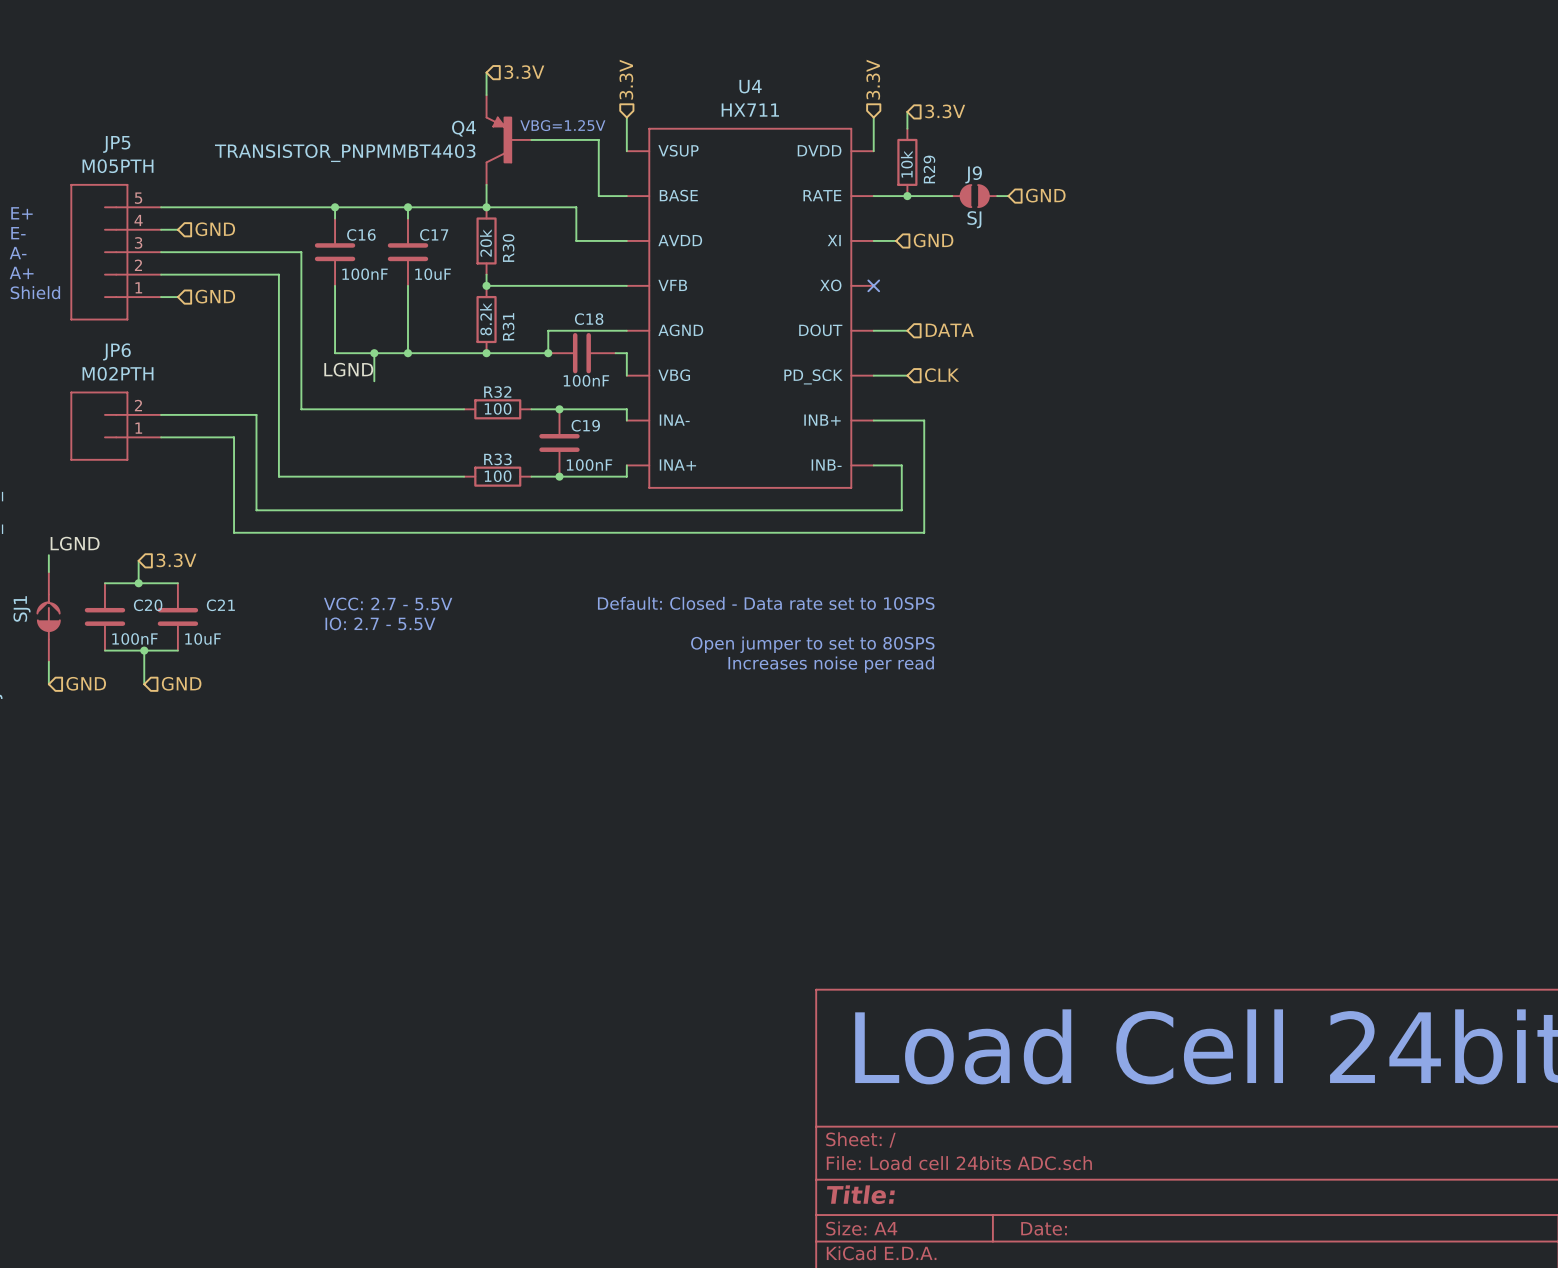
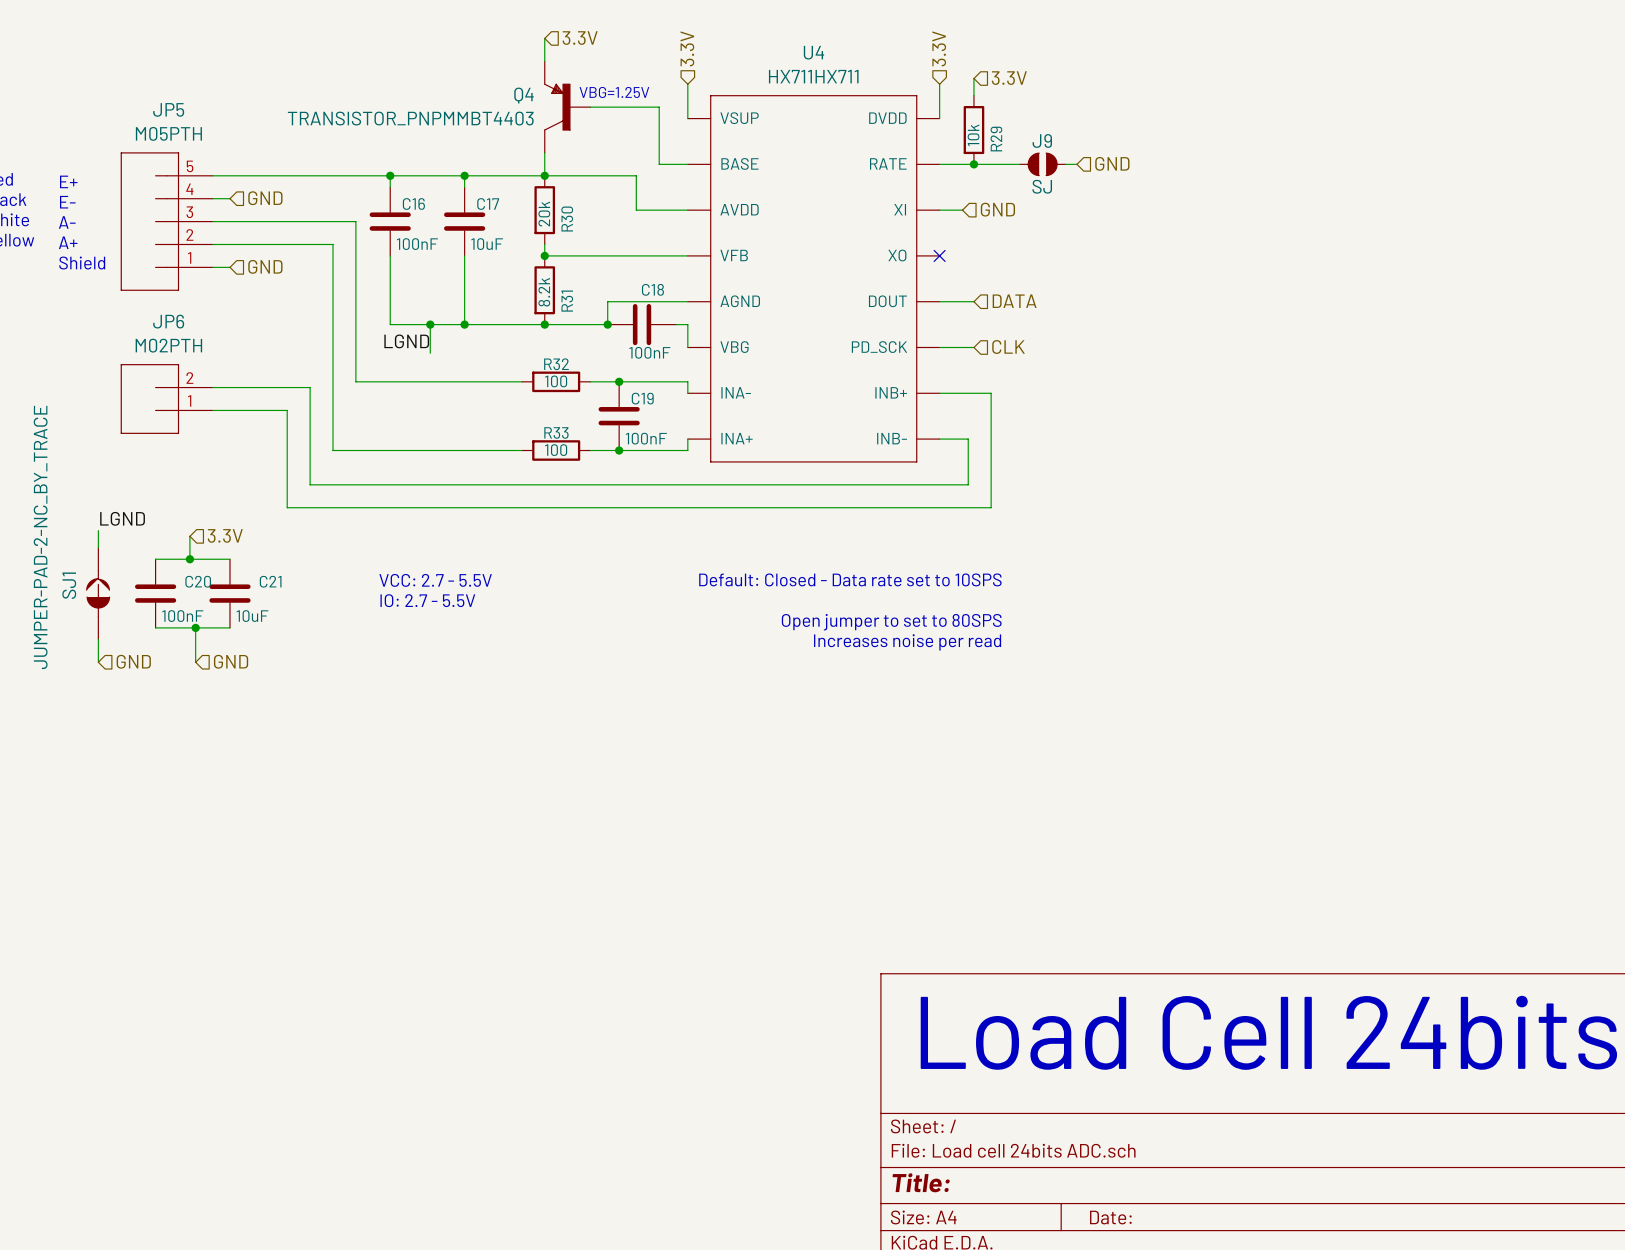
U4 value: HX711 (750, 110) -> HX711HX711 (813, 76)

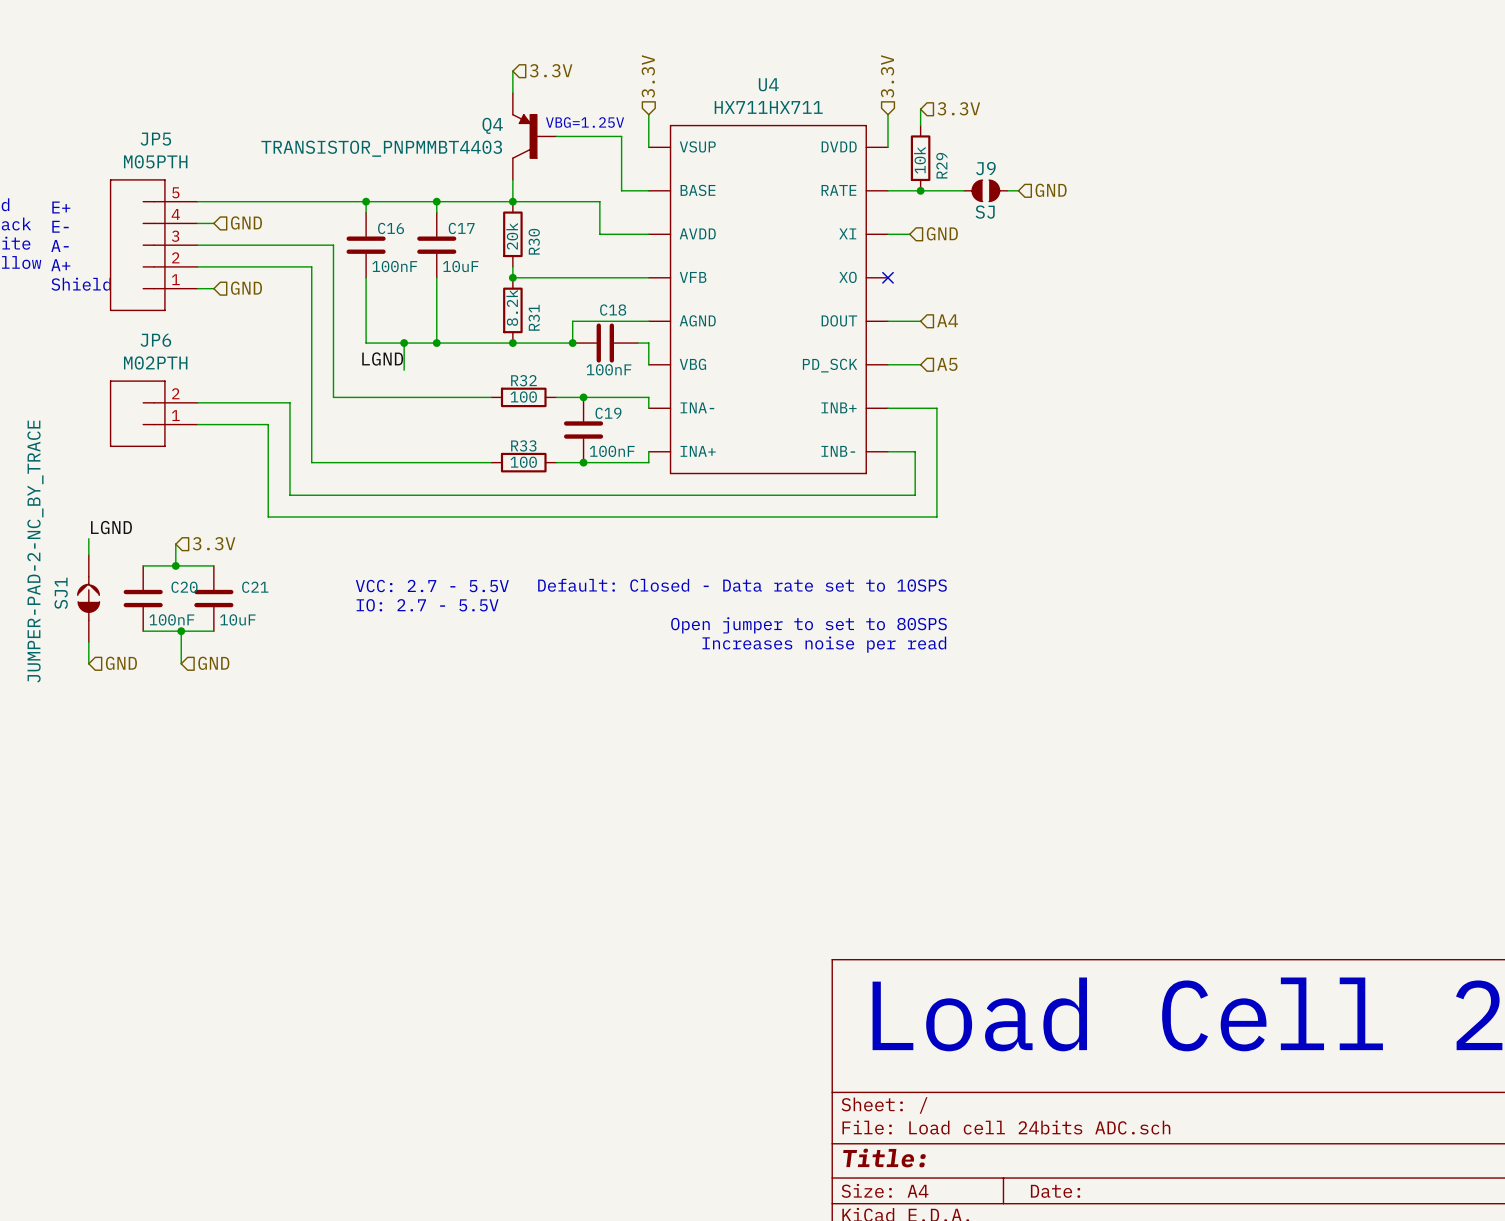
hierarchical label: DATA (1014, 301) -> A4 (947, 320)
hierarchical label: CLK (1008, 347) -> A5 (947, 364)

